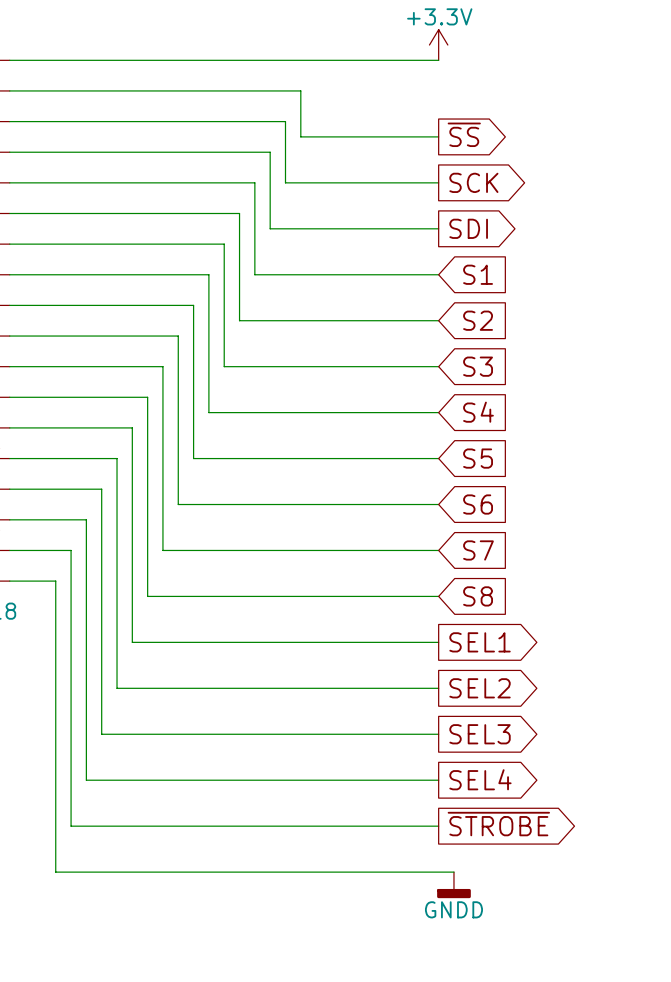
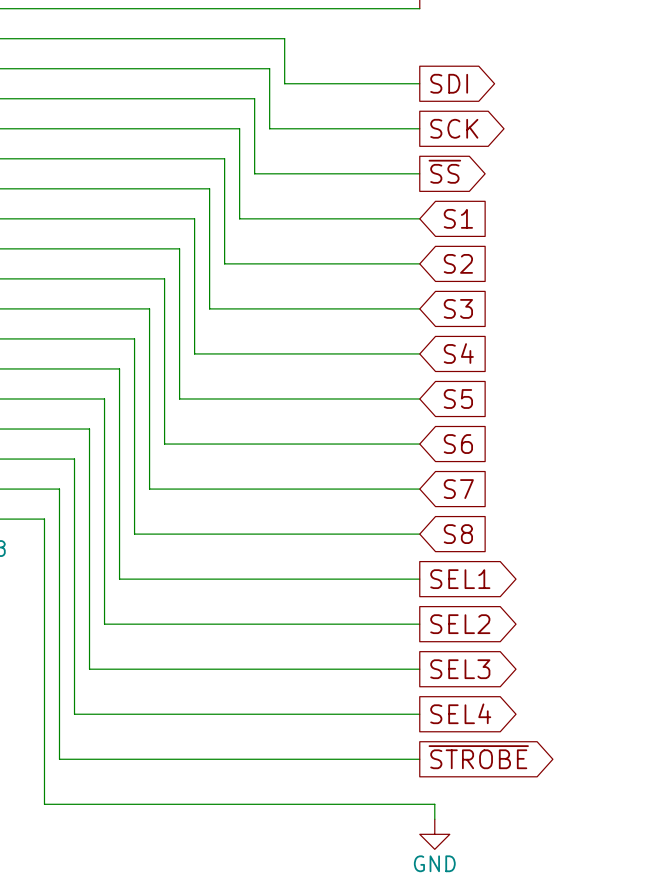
global label: ~{SS} (464, 134) -> SDI (449, 83)
global label: SDI (468, 228) -> ~{SS} (444, 171)
power symbol: GNDD (453, 885) -> none
power symbol: none -> GND (434, 834)

